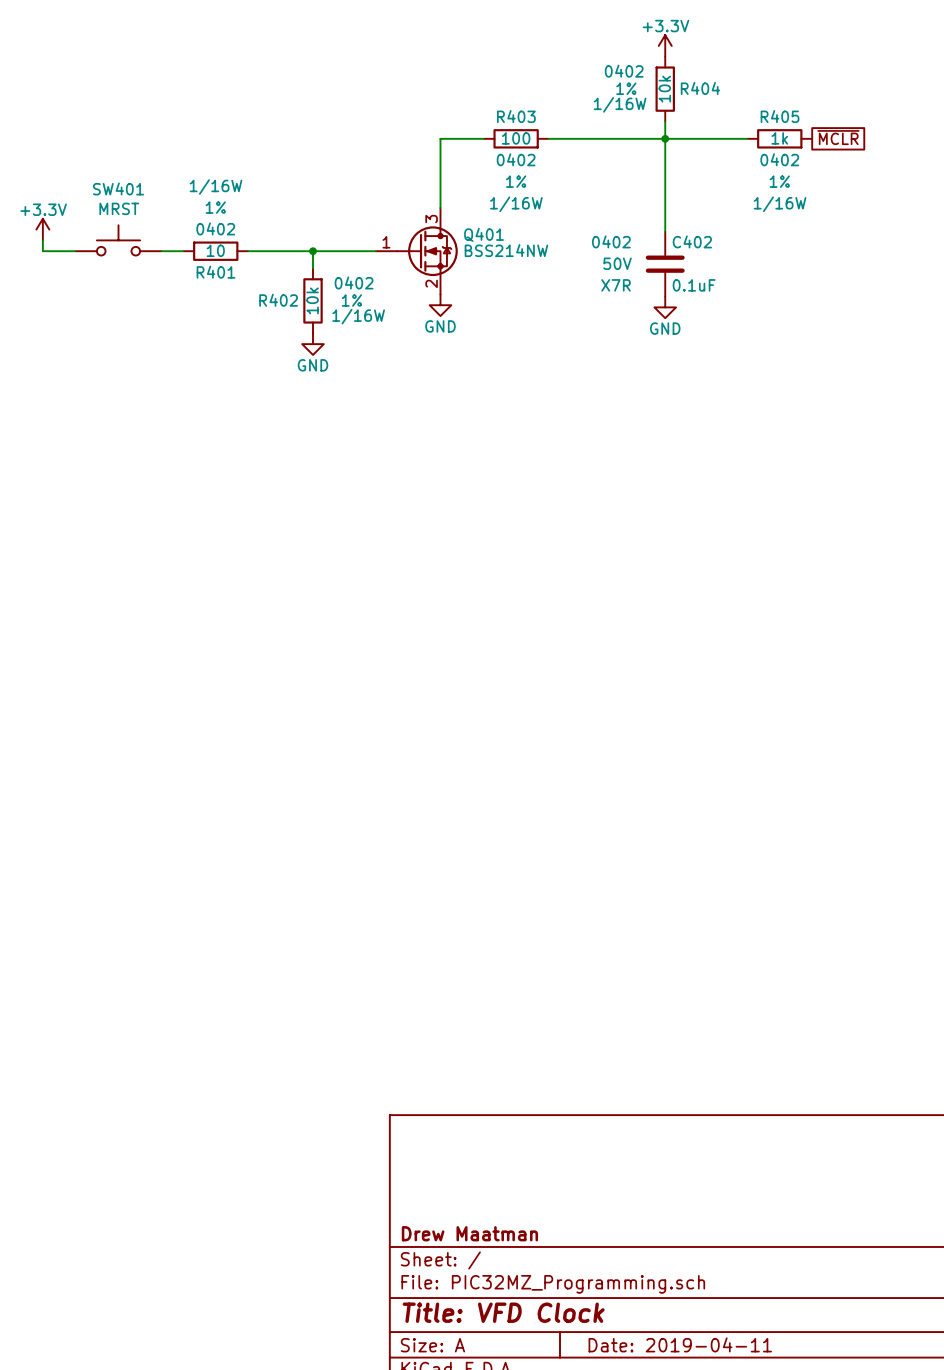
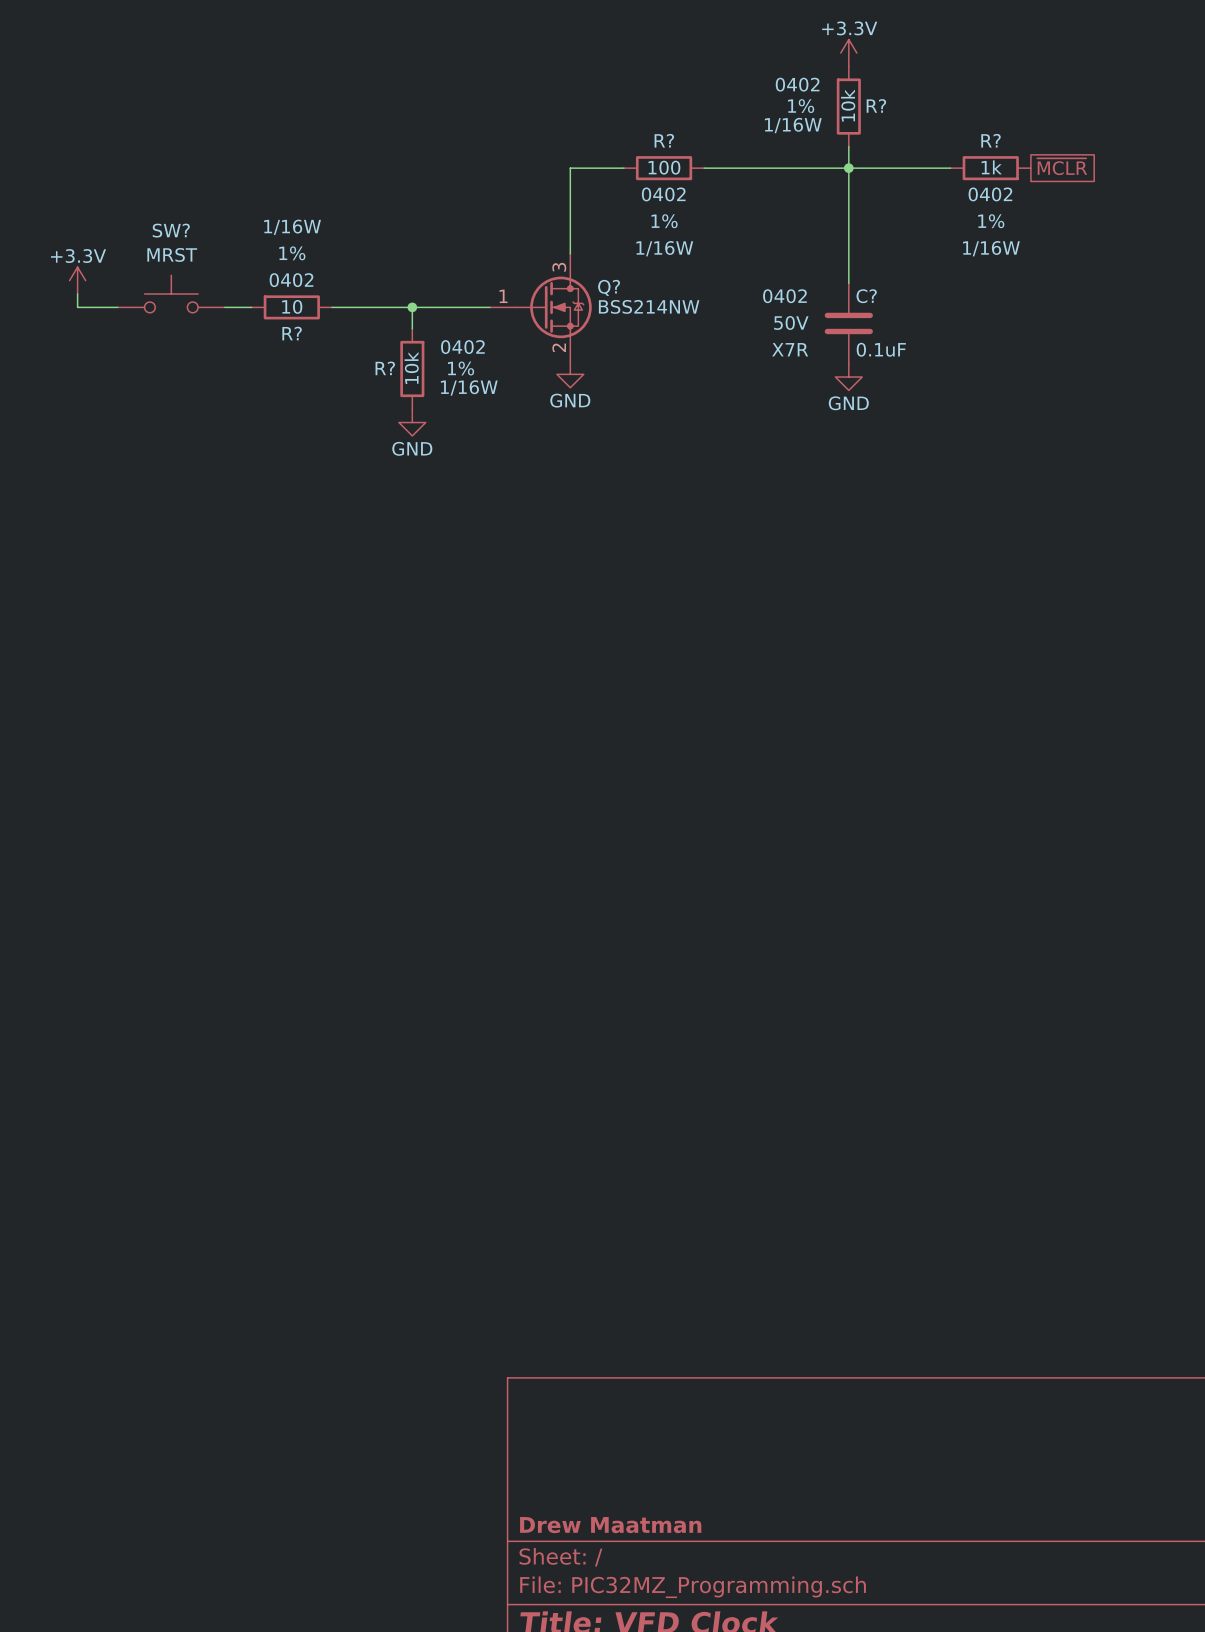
R404 name: R404 (700, 88) -> R? (876, 105)
R403 name: R403 (516, 116) -> R? (664, 140)
R405 name: R405 (780, 116) -> R? (991, 140)
SW401 name: SW401 (118, 188) -> SW? (171, 230)
Q401 name: Q401 (484, 234) -> Q? (609, 287)
C402 name: C402 (692, 241) -> C? (866, 296)
R401 name: R401 (216, 272) -> R? (292, 333)
R402 name: R402 (278, 300) -> R? (385, 368)

